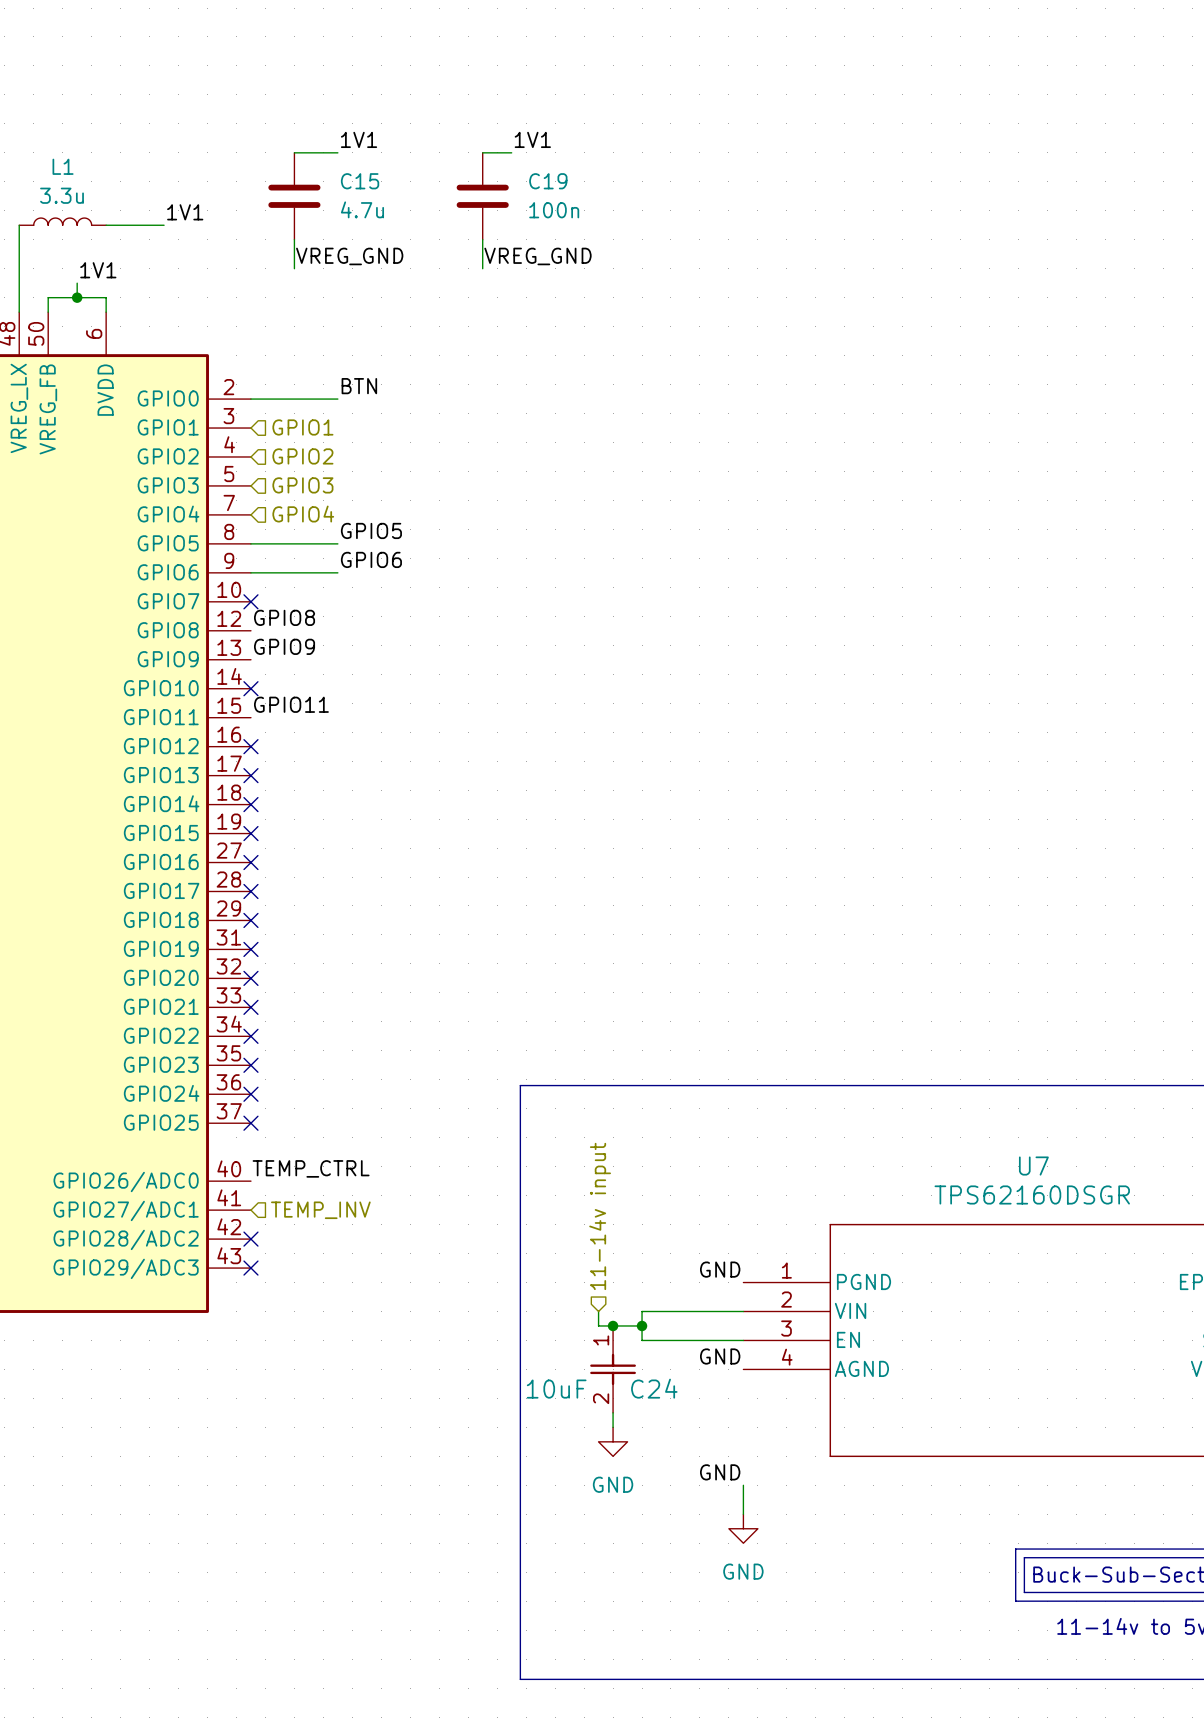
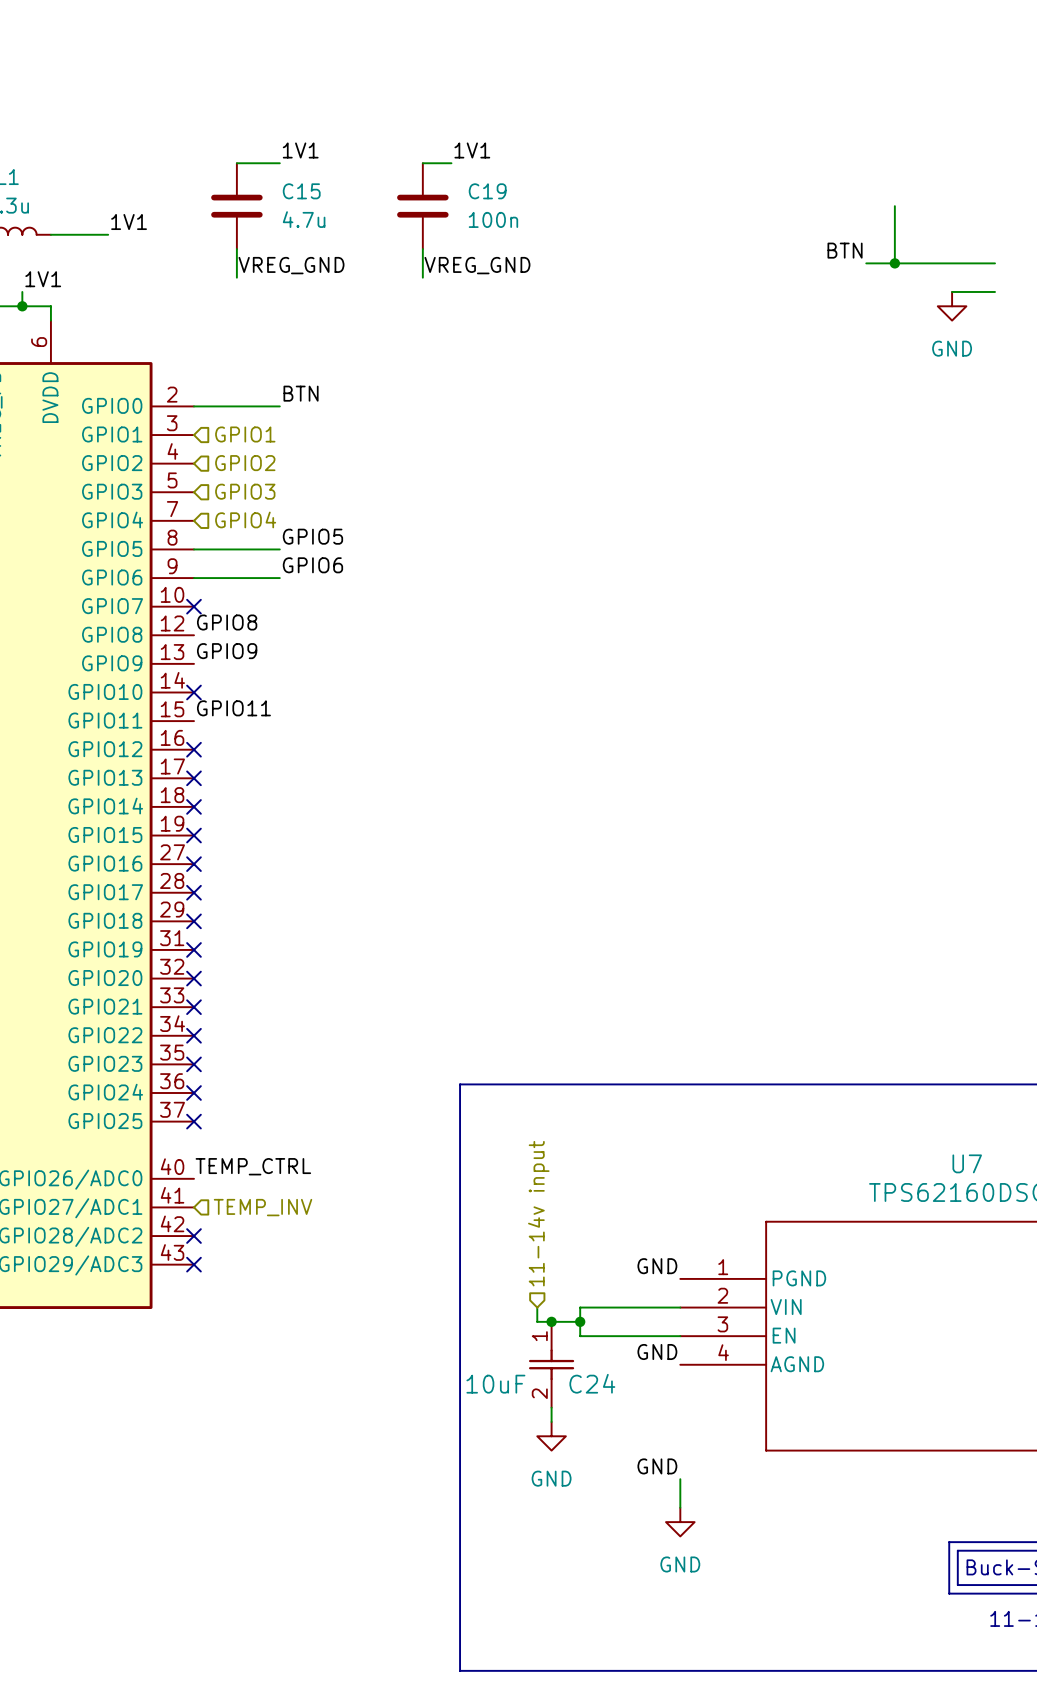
wire: none -> (894, 206) (894, 263)
label: none -> BTN (845, 250)
wire: none -> (866, 263) (995, 263)
junction: none -> (894, 263)
wire: none -> (952, 291) (995, 291)
power symbol: none -> GND (952, 306)

